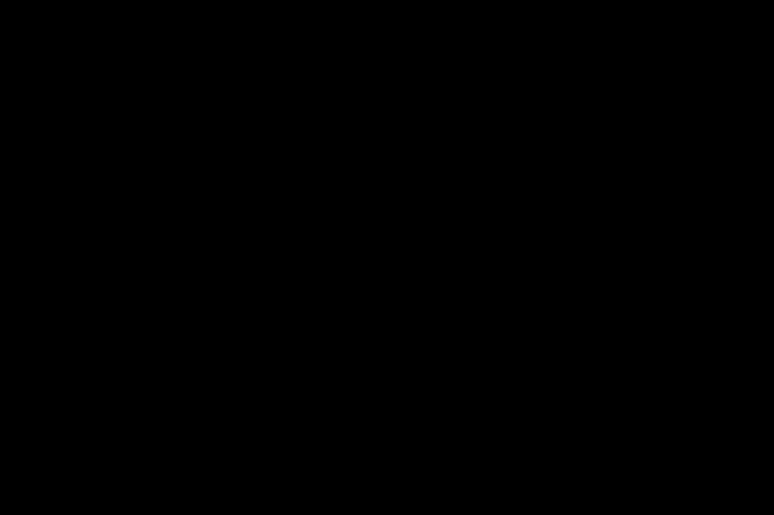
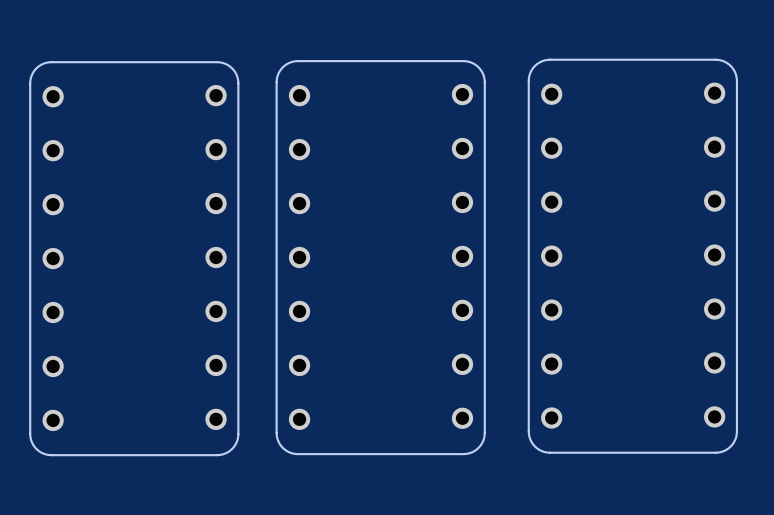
board edge: none -> (715, 59) (547, 59) (538, 62) (530, 71) (528, 80) (528, 431) (532, 442) (540, 450) (550, 452) (715, 452) (727, 449) (734, 440) (736, 431) (736, 80) (735, 73) (730, 65) (722, 60) (715, 59)
board edge: none -> (463, 61) (295, 61) (284, 65) (278, 73) (276, 82) (276, 432) (279, 444) (288, 452) (297, 454) (463, 454) (474, 450) (482, 442) (484, 432) (484, 82) (482, 73) (478, 67) (470, 62) (463, 61)
board edge: none -> (217, 62) (49, 62) (40, 65) (32, 74) (30, 83) (30, 433) (33, 445) (42, 453) (51, 455) (217, 455) (228, 451) (236, 443) (238, 433) (238, 83) (236, 74) (232, 68) (224, 63) (217, 62)
part: none -> (714, 255)
part: none -> (462, 256)
part: none -> (551, 256)
part: none -> (216, 257)
part: none -> (299, 257)
part: none -> (53, 258)

